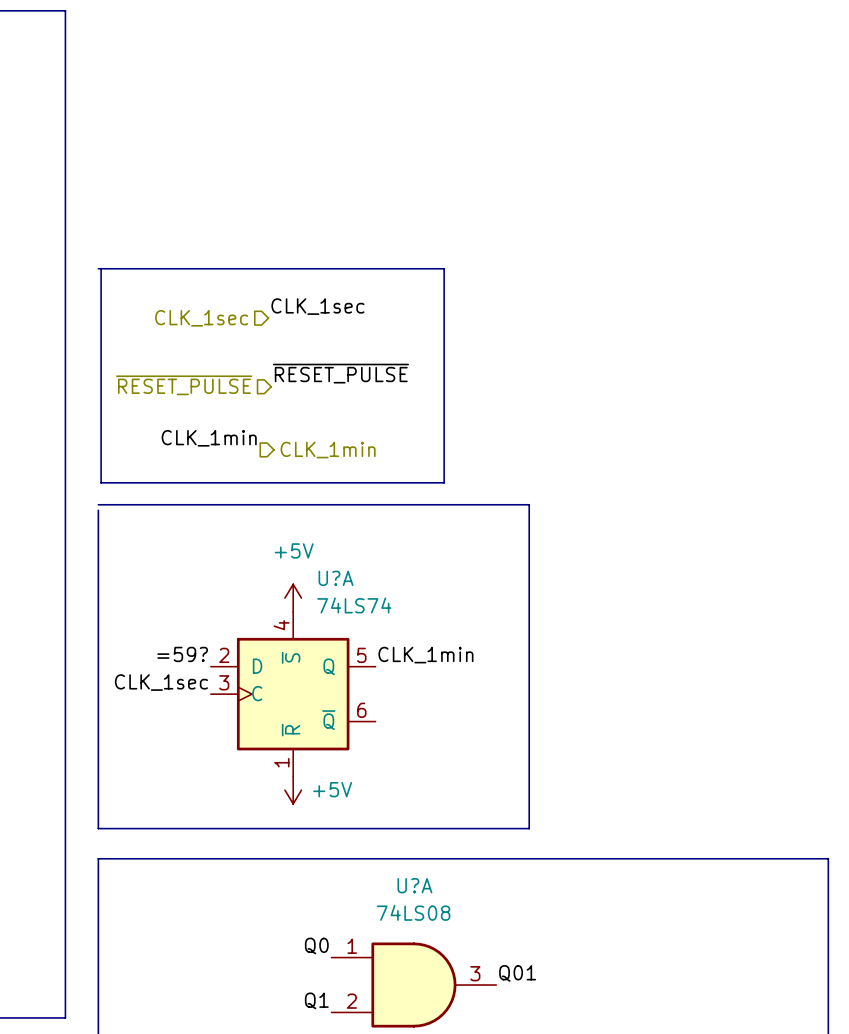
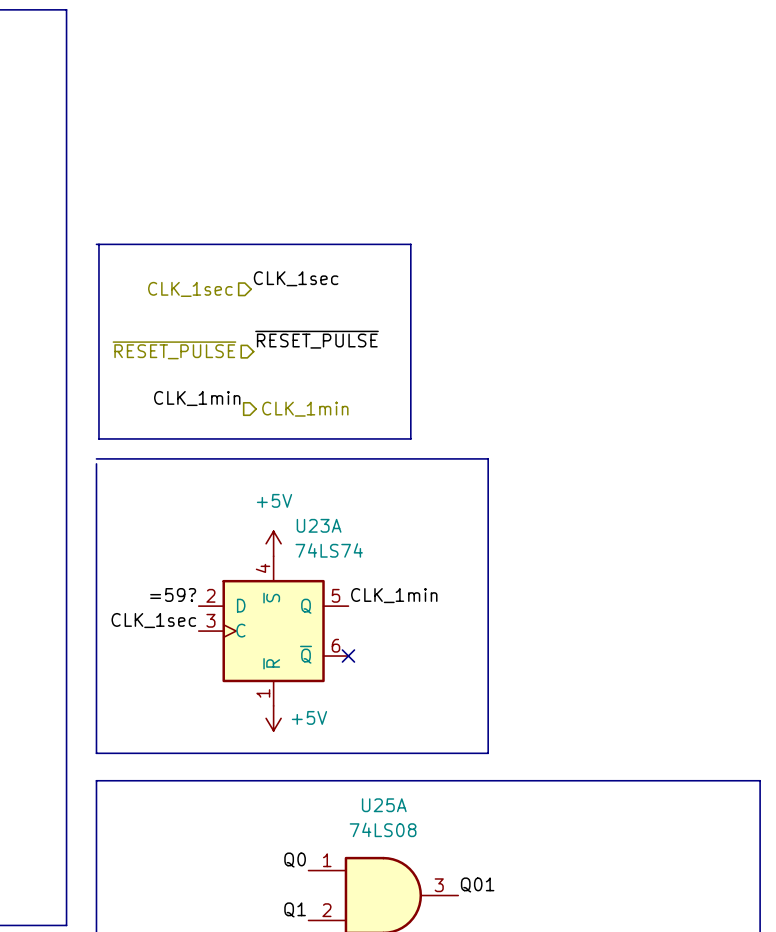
U?A name: U?A (336, 578) -> U23A (319, 525)
no-connect mark: none -> (348, 656)
U?A name: U?A (414, 885) -> U25A (384, 805)

